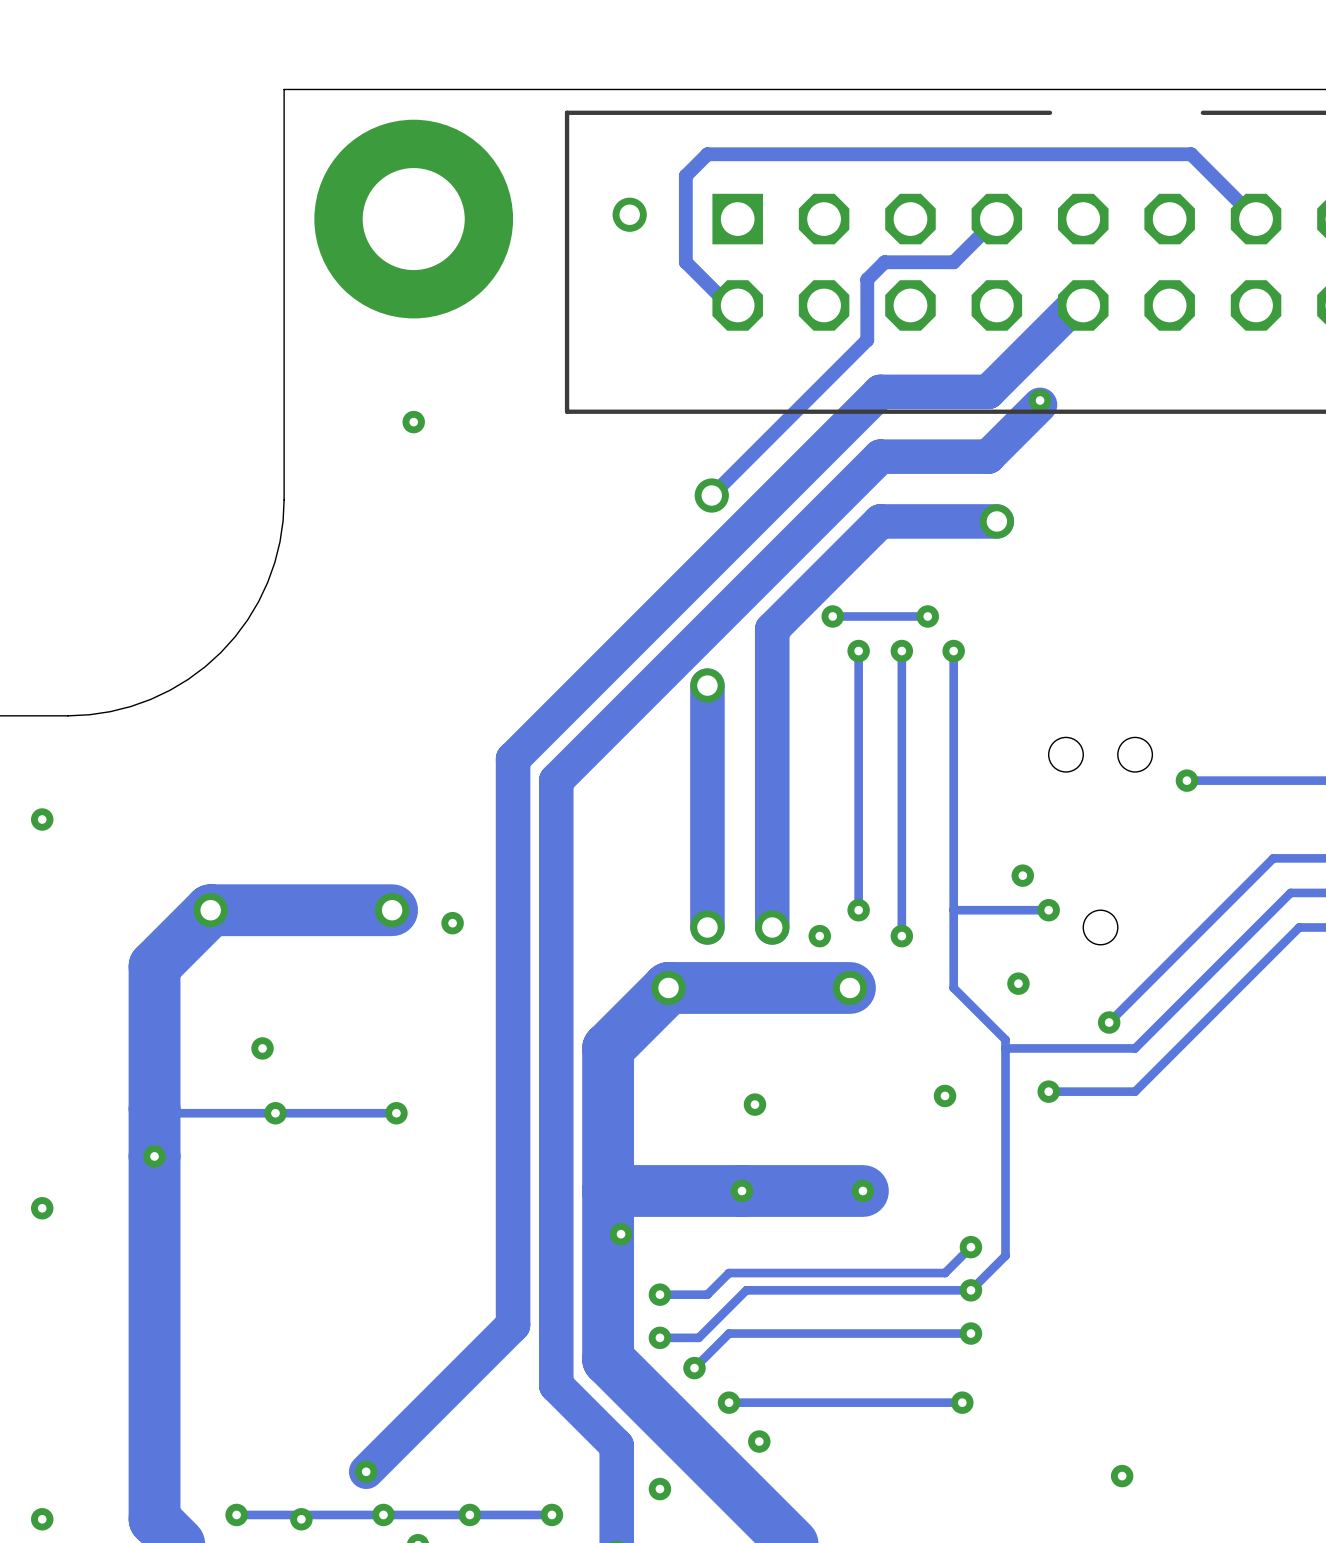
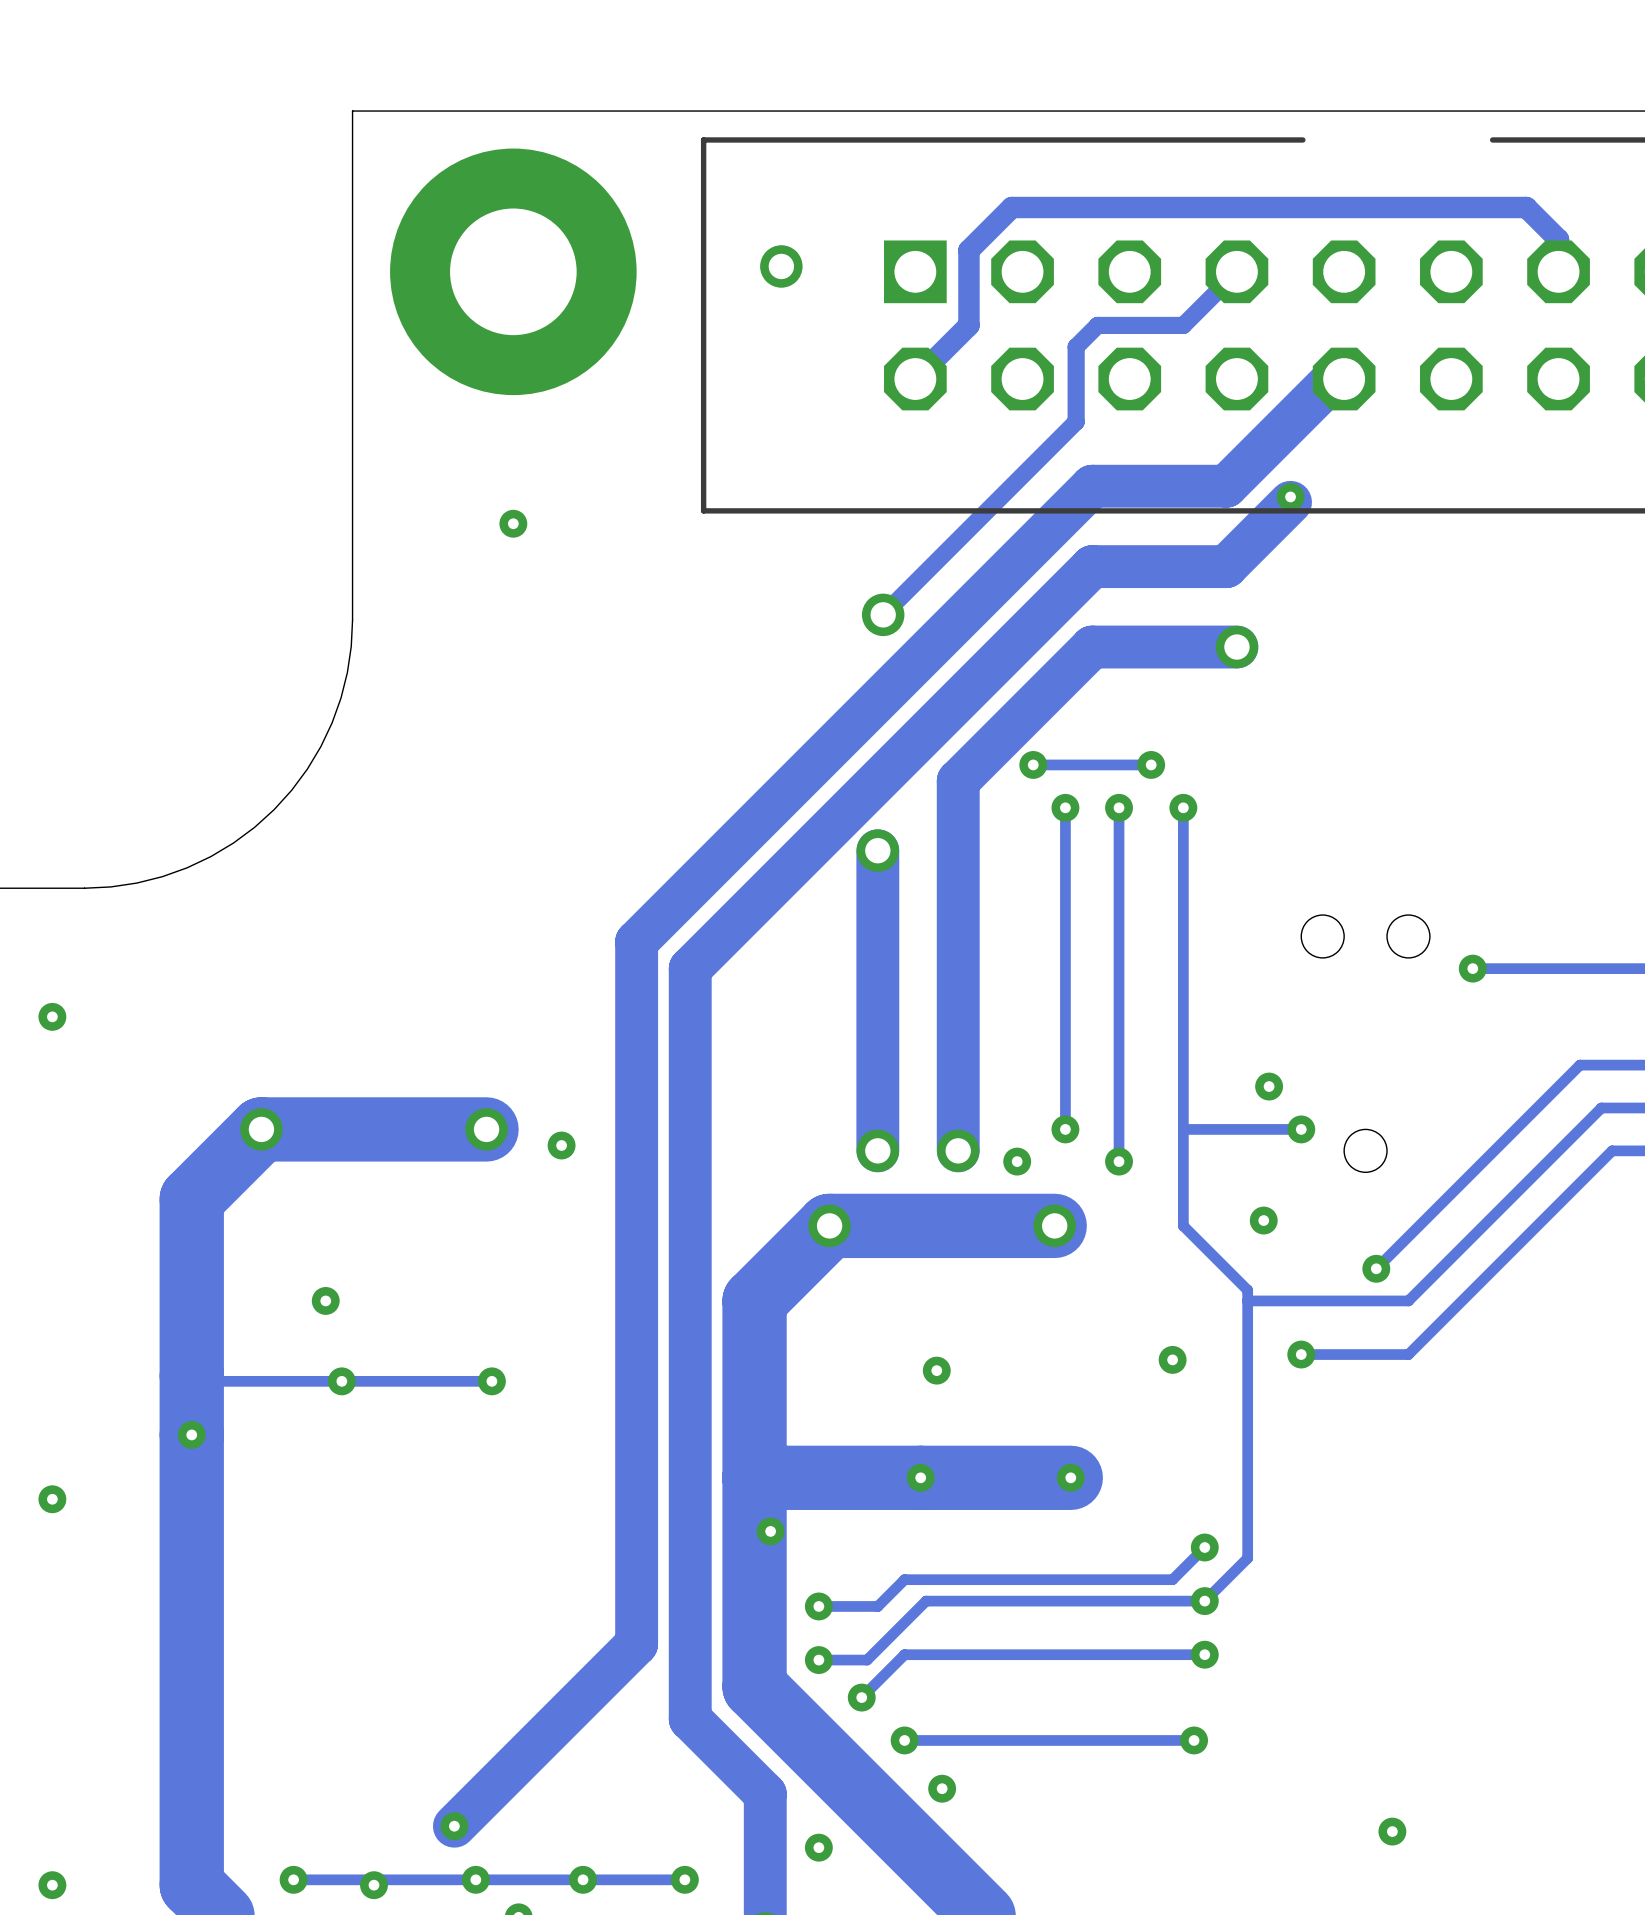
track: (1256, 219) (1191, 154) (707, 154) (685, 175) (685, 262) (729, 305) -> (1558, 271) (1558, 239) (1526, 207) (1011, 207) (968, 250) (968, 325) (915, 379)

